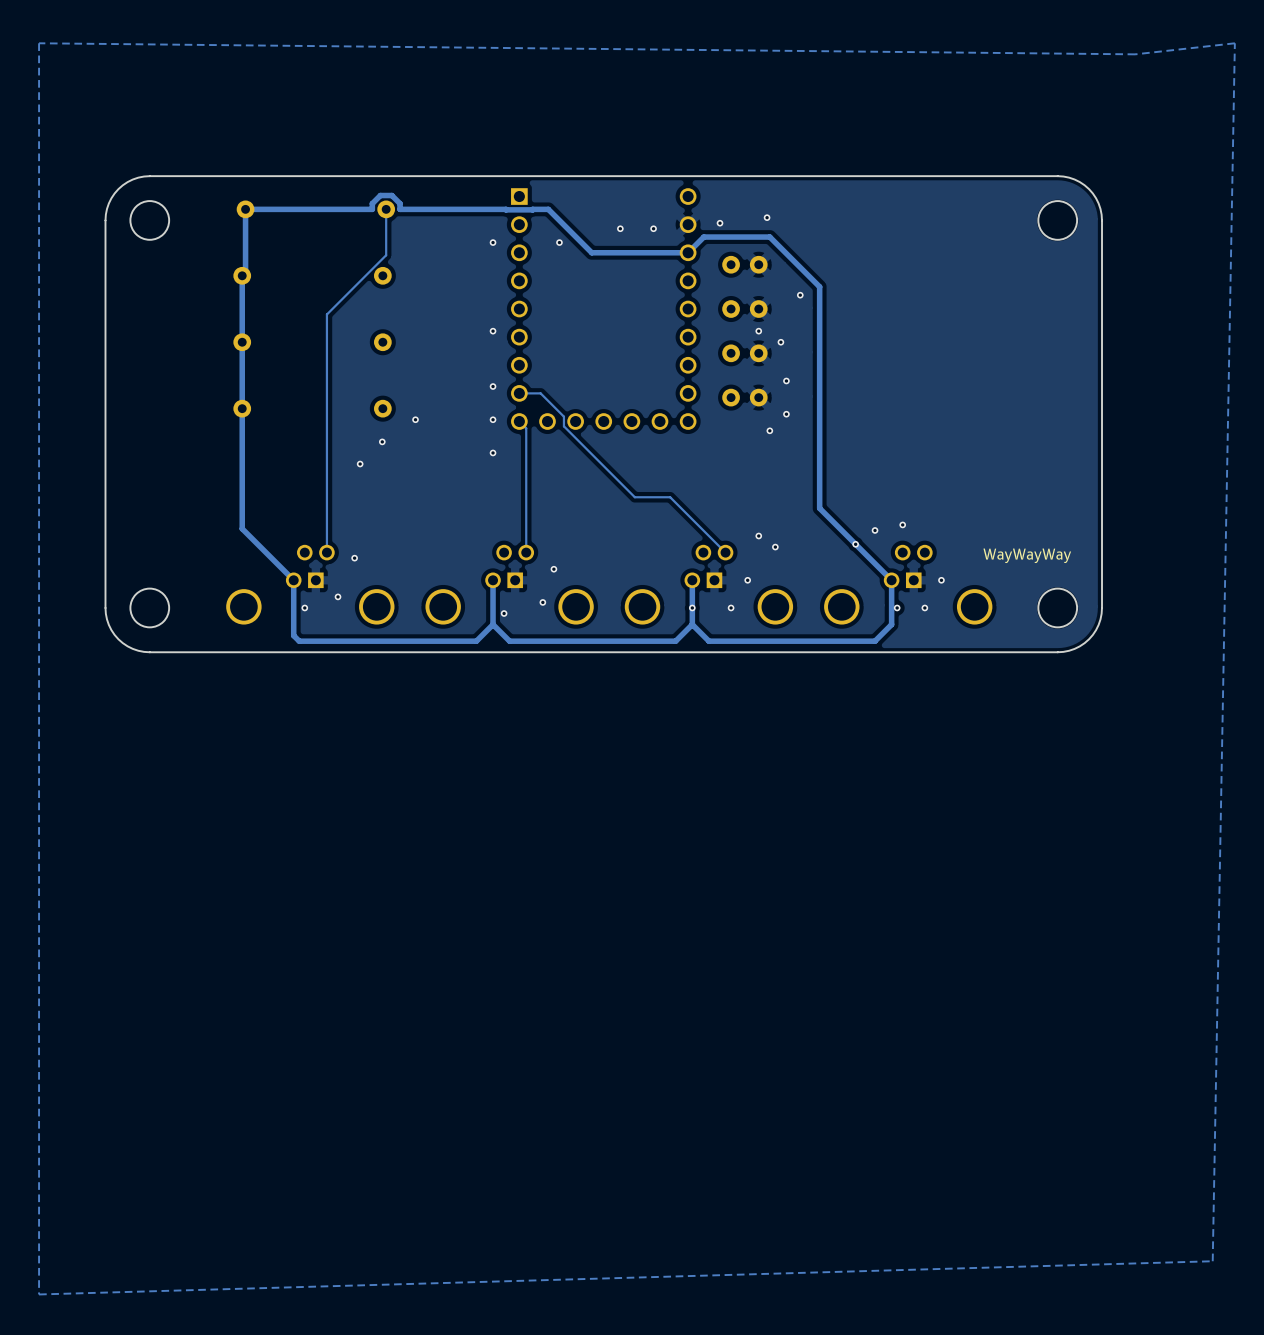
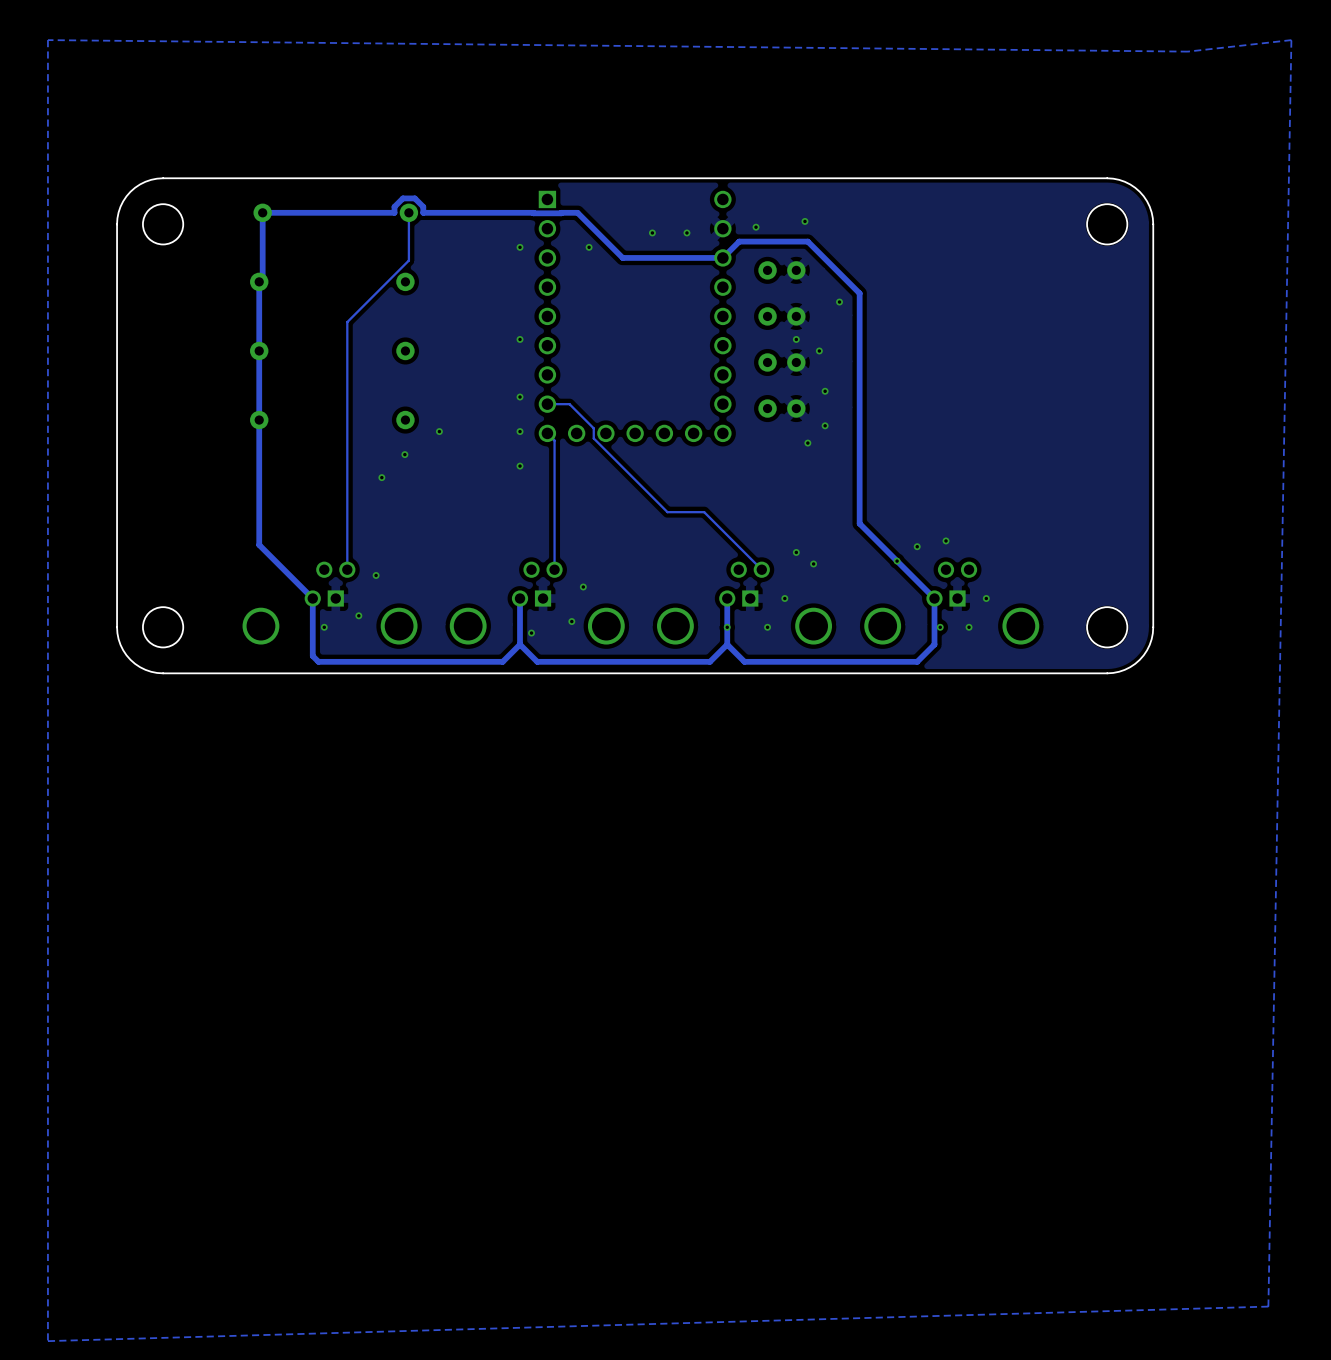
text: WayWayWay (1027, 555) -> none

